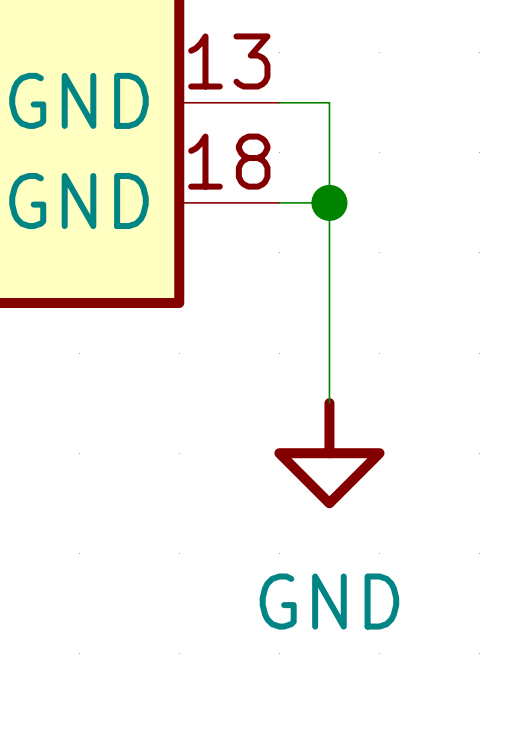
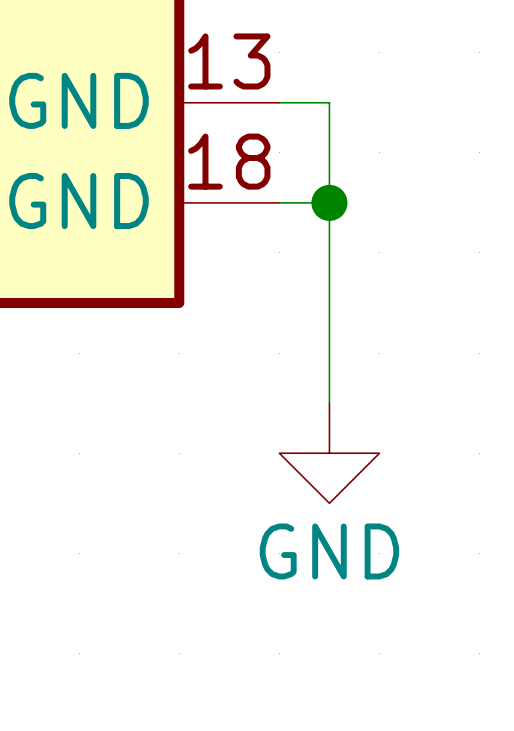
power symbol shape: [274, 398, 385, 509] -> [279, 403, 380, 504]
power symbol text position: GND (329, 601) -> GND (329, 551)

